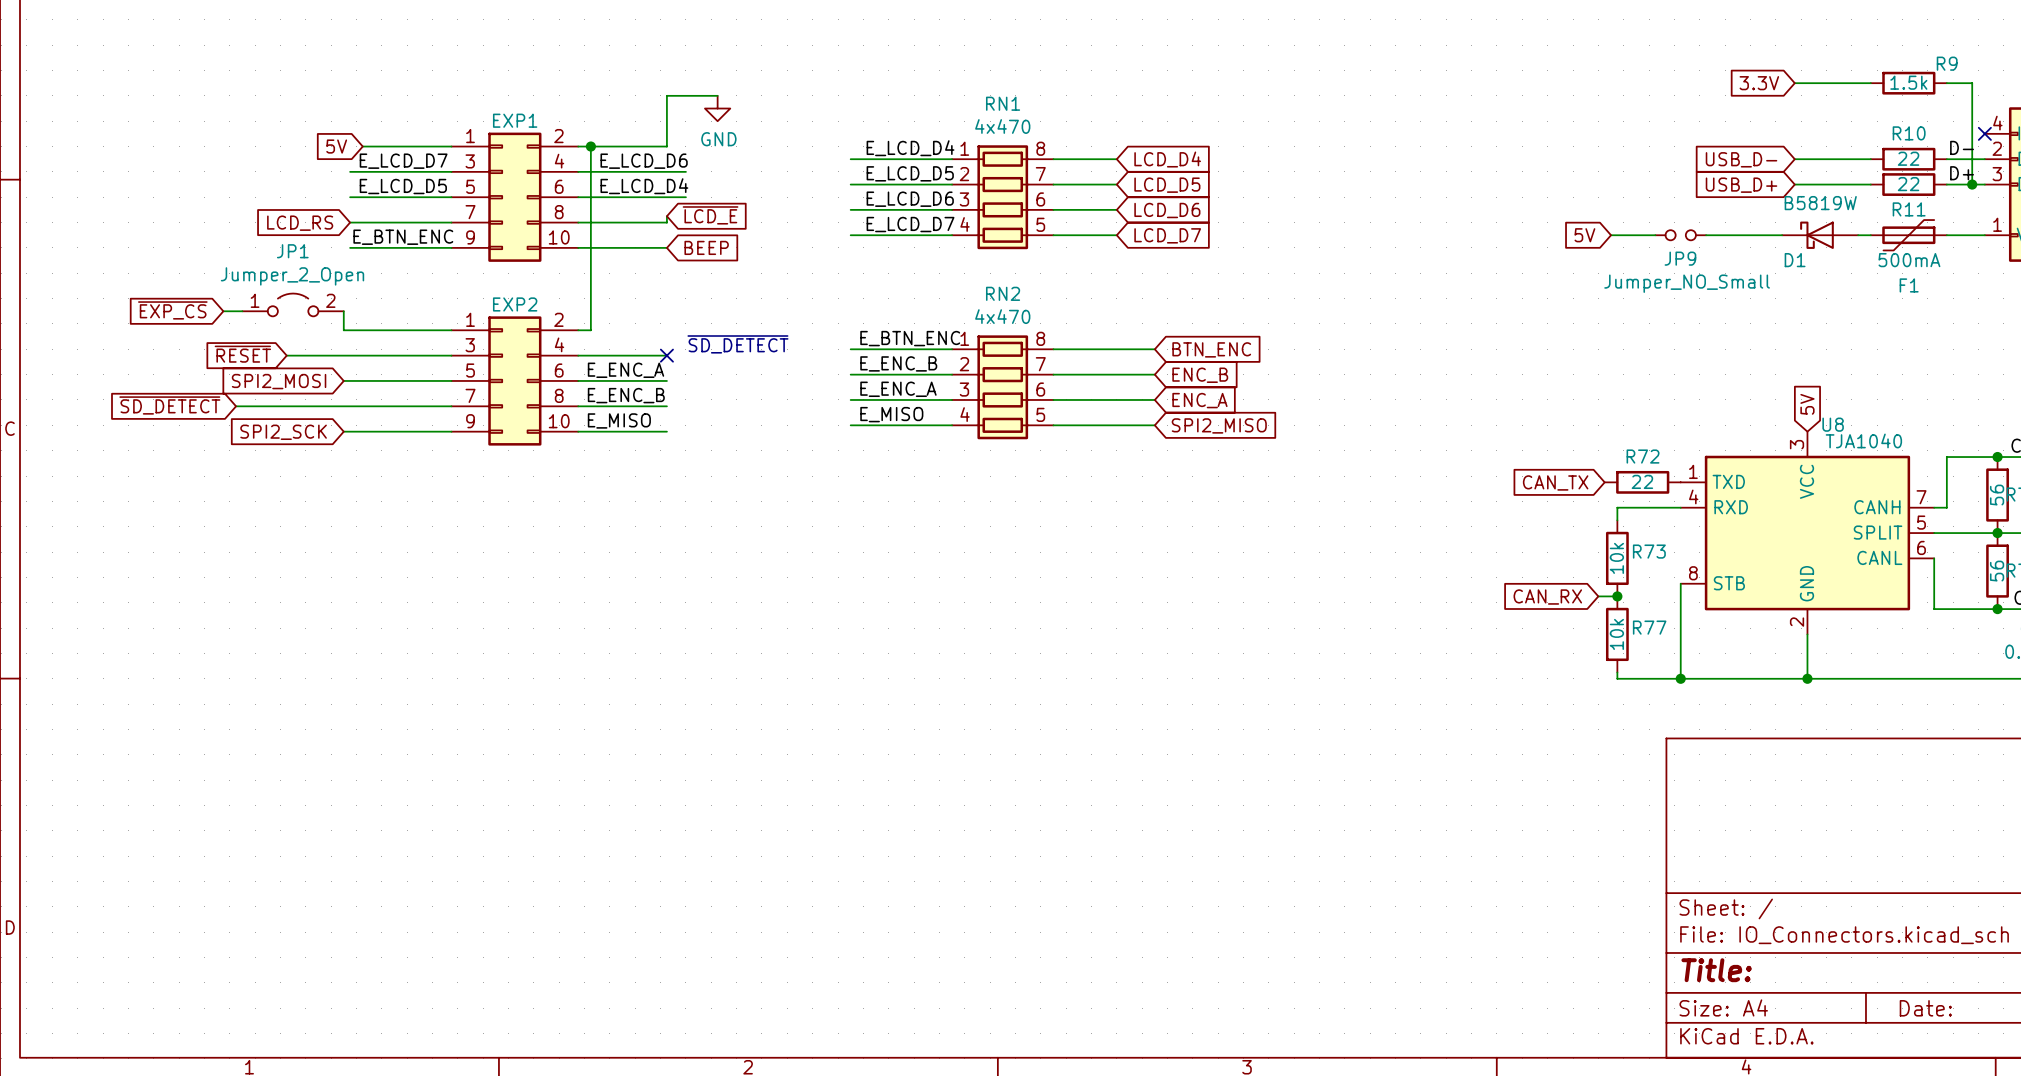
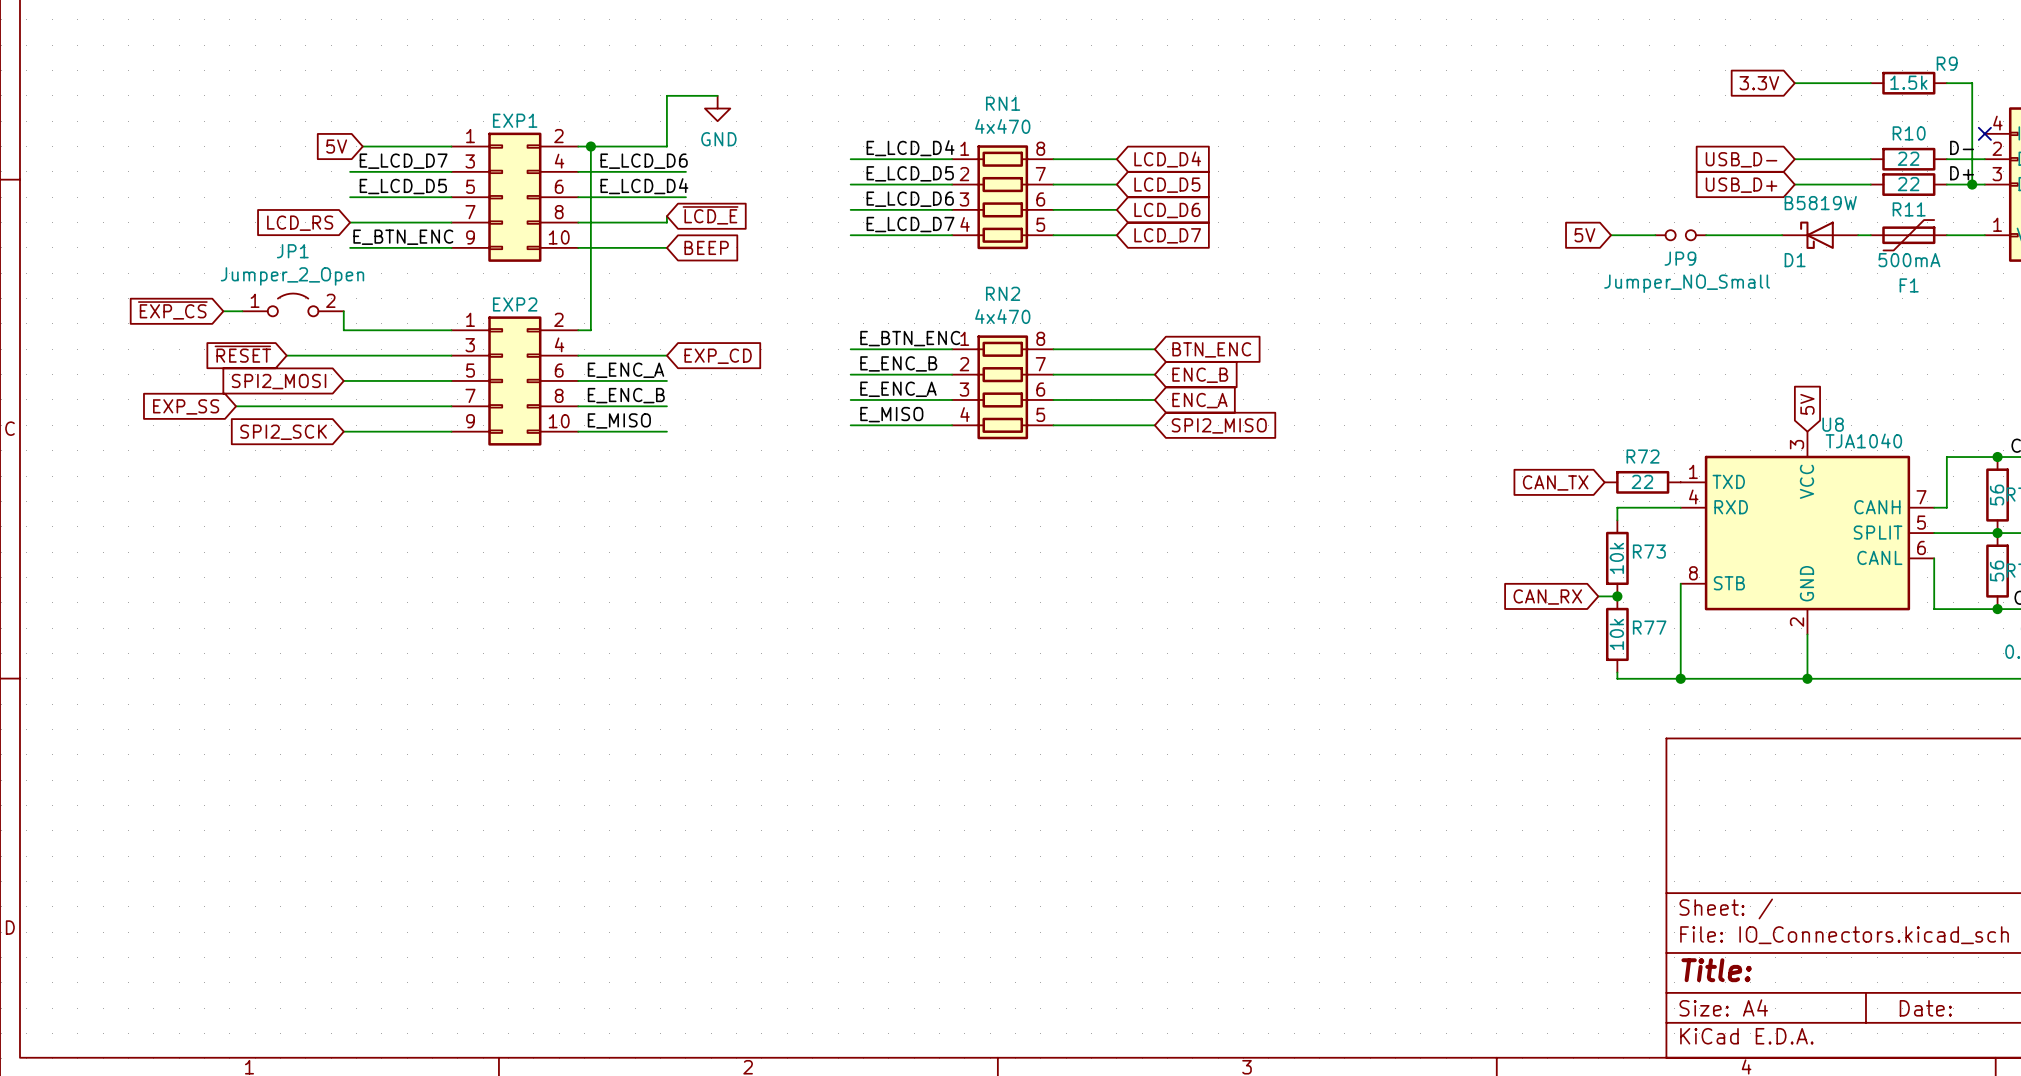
text: ~{SD_DETECT} (737, 344) -> none
no-connect mark: (666, 355) -> none
global label: none -> EXP_CD (718, 356)
global label: ~{SD_DETECT} (169, 405) -> EXP_SS (186, 406)

